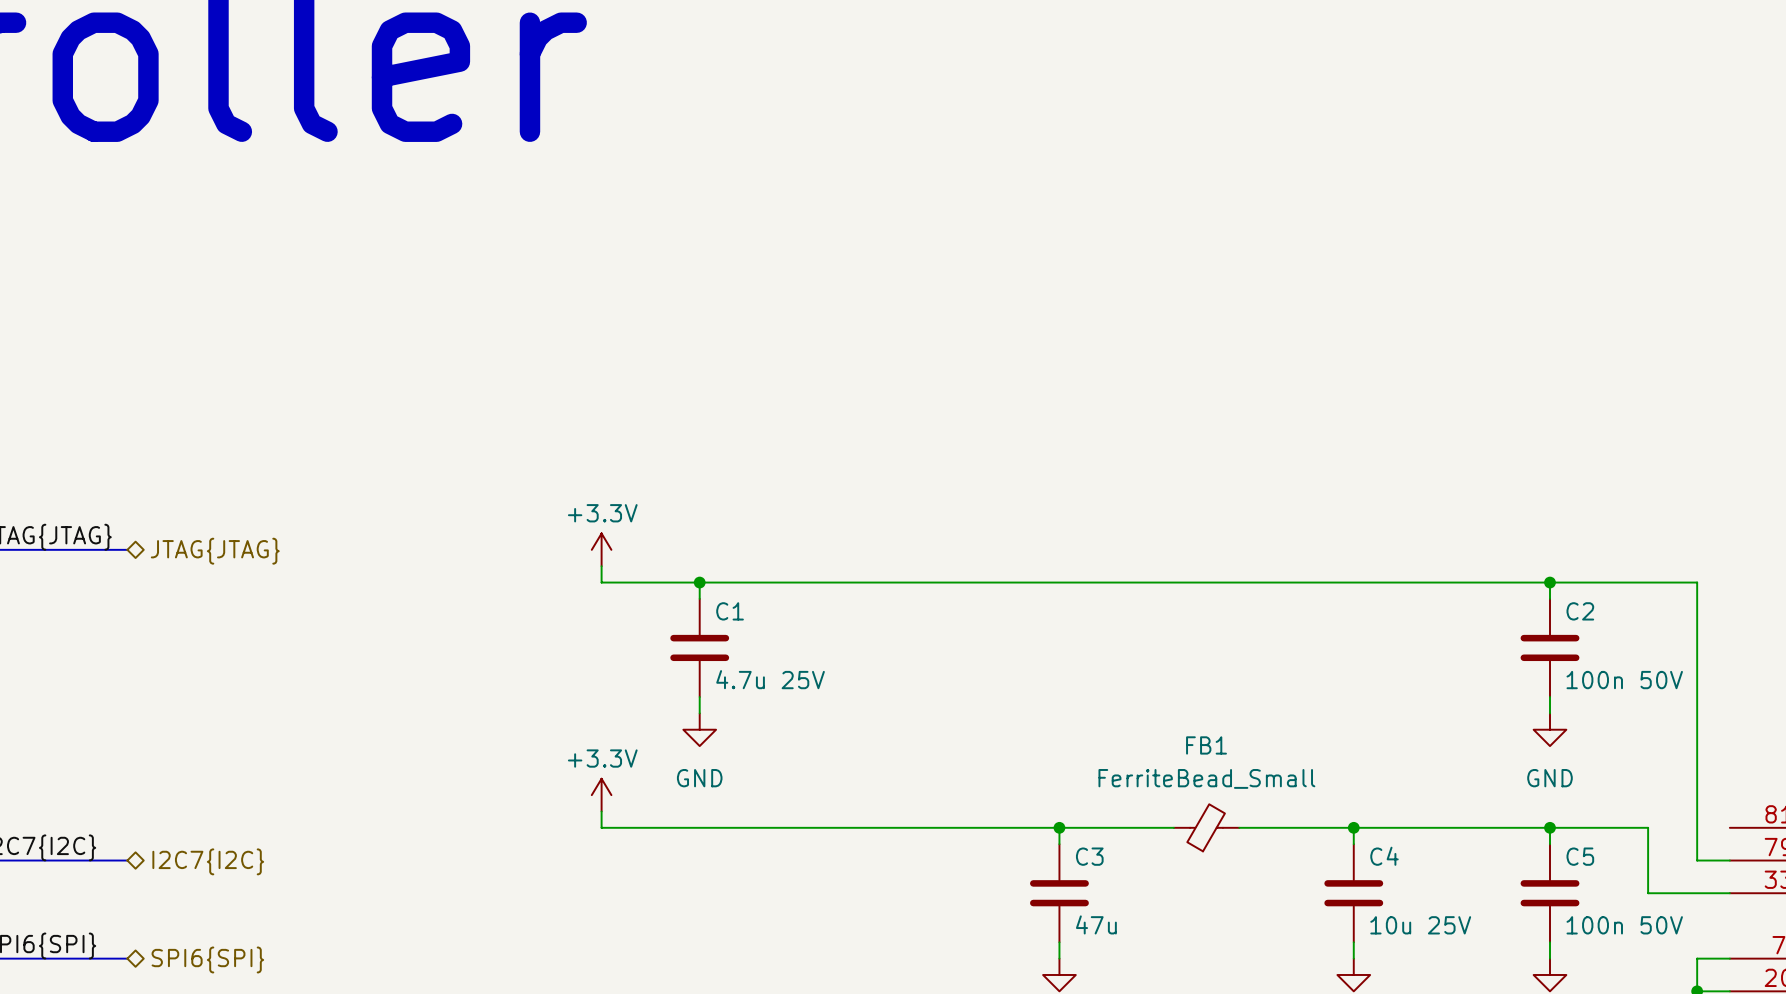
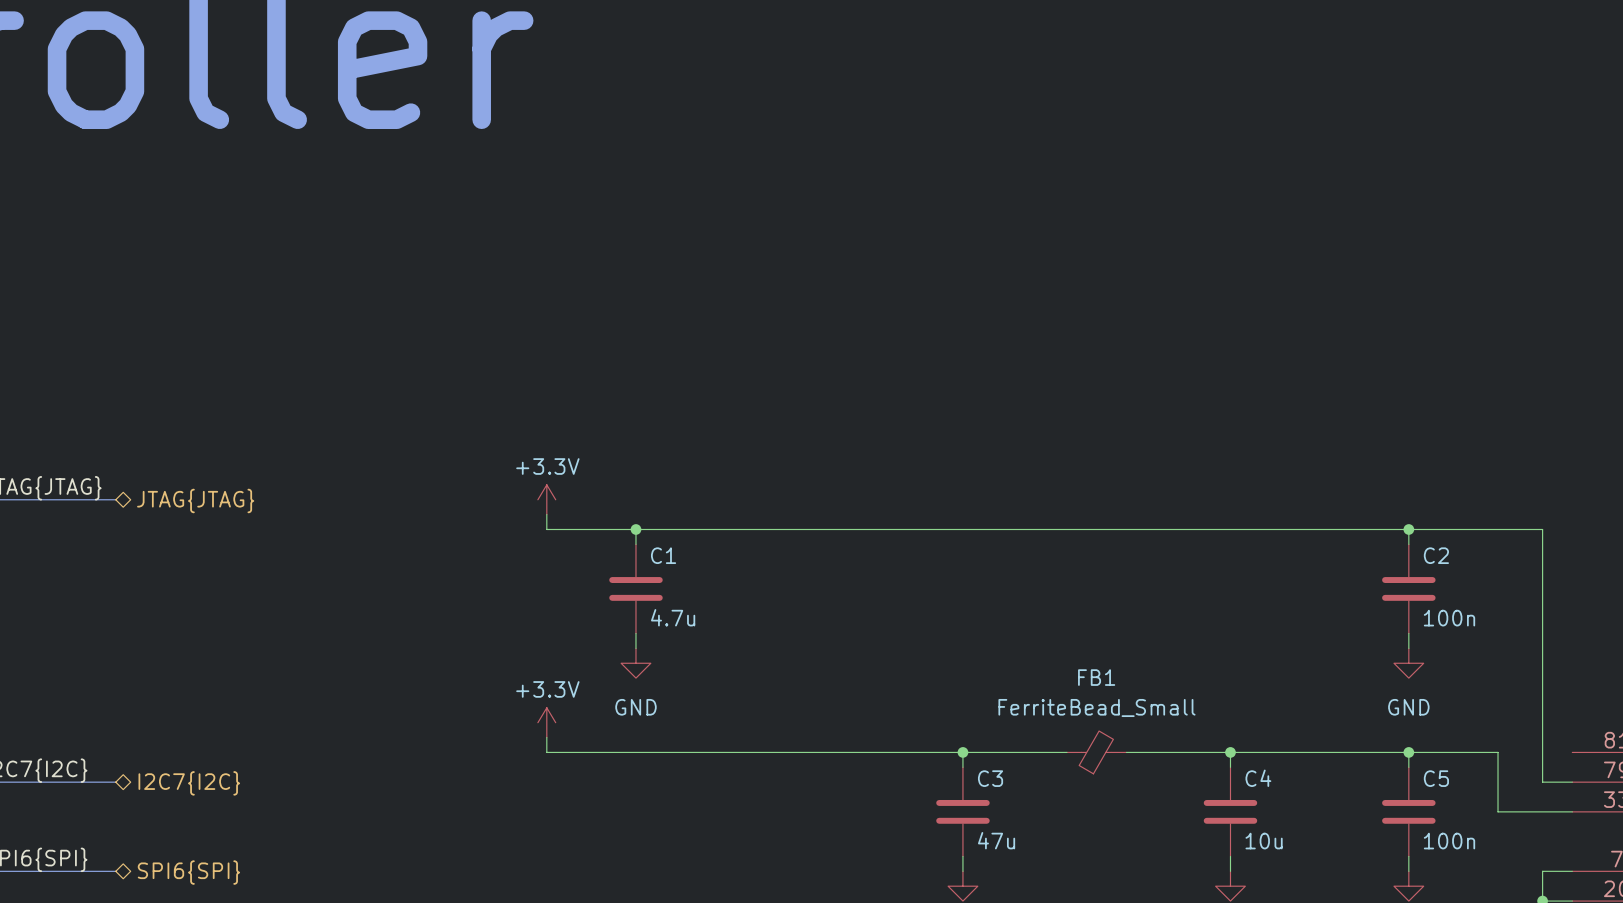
C1 value: 4.7u 25V (770, 679) -> 4.7u (673, 617)
C2 value: 100n 50V (1624, 680) -> 100n (1449, 618)
C4 value: 10u 25V (1420, 925) -> 10u (1264, 841)
C5 value: 100n 50V (1624, 925) -> 100n (1449, 841)

